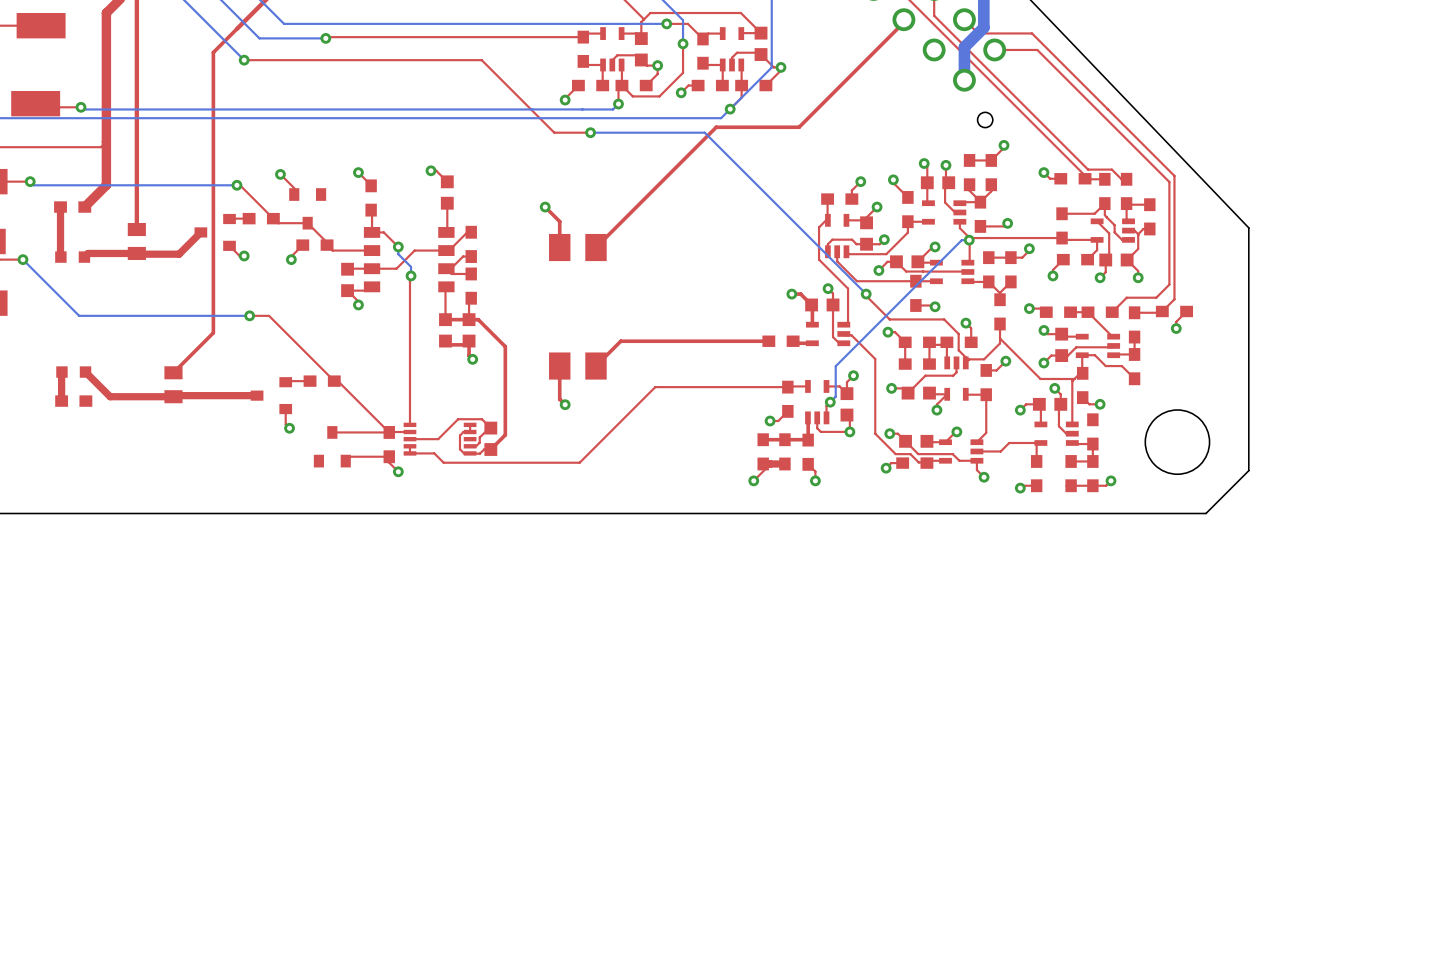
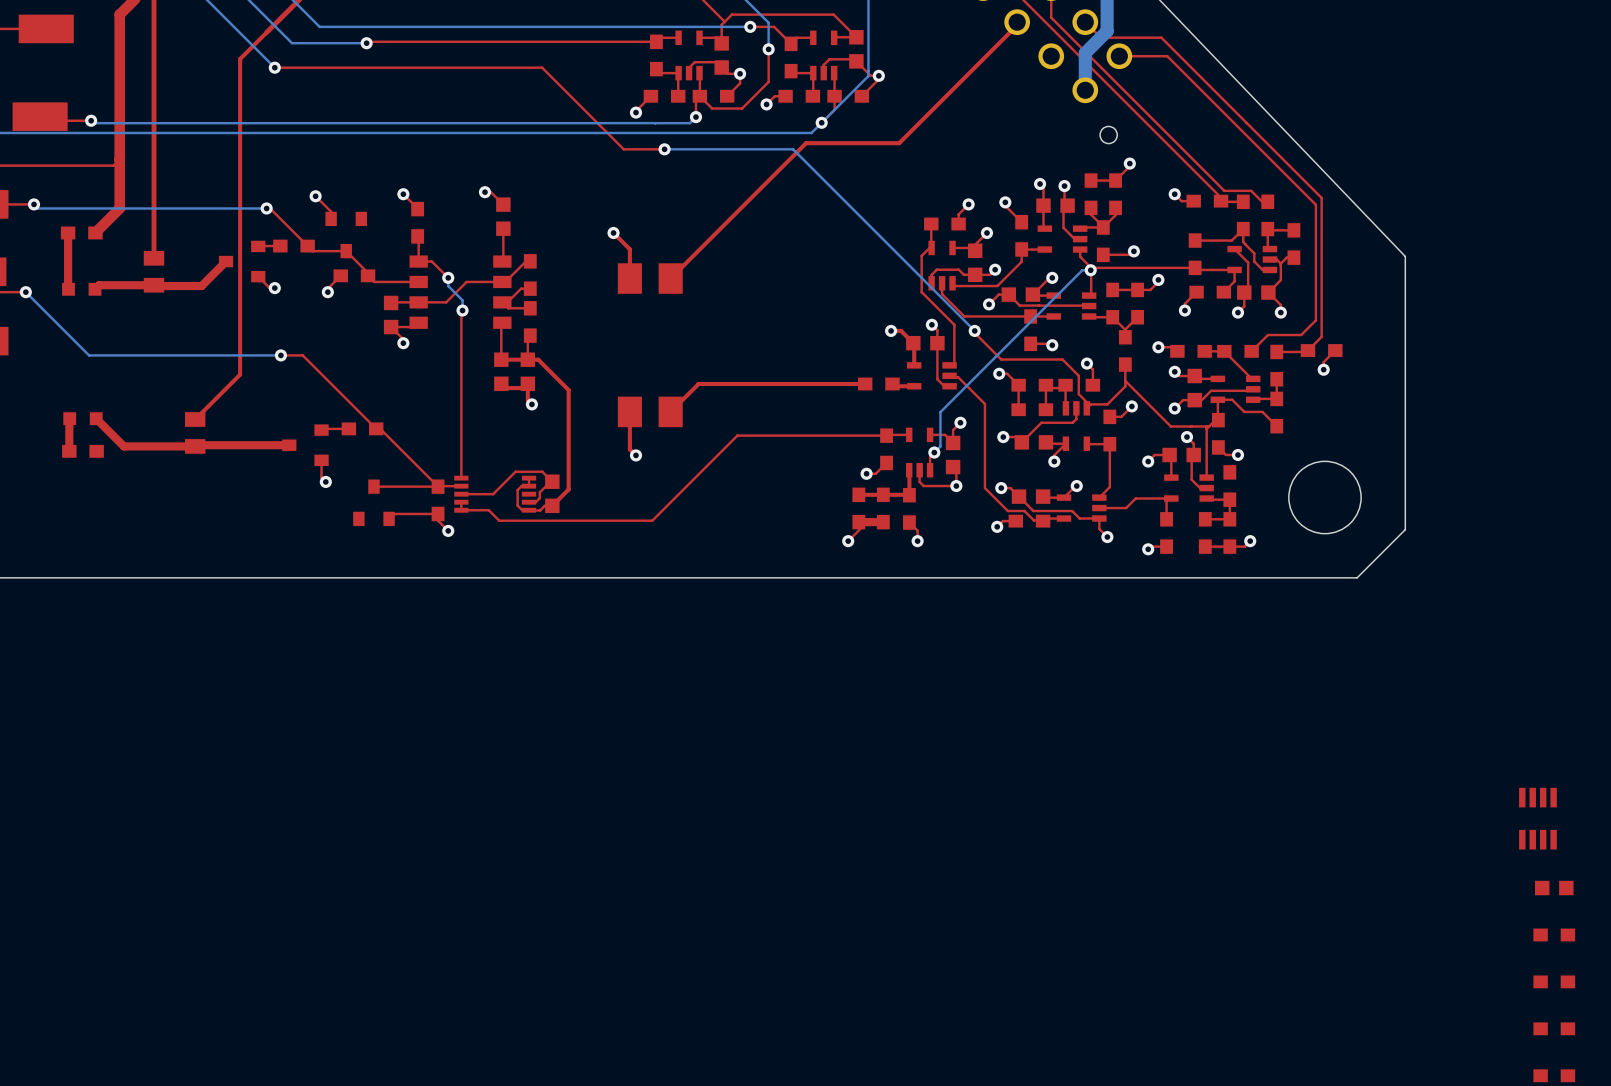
part: none -> (1537, 818)
part: none -> (1554, 888)
part: none -> (1554, 934)
part: none -> (1554, 981)
part: none -> (1554, 1028)
part: none -> (1554, 1075)

